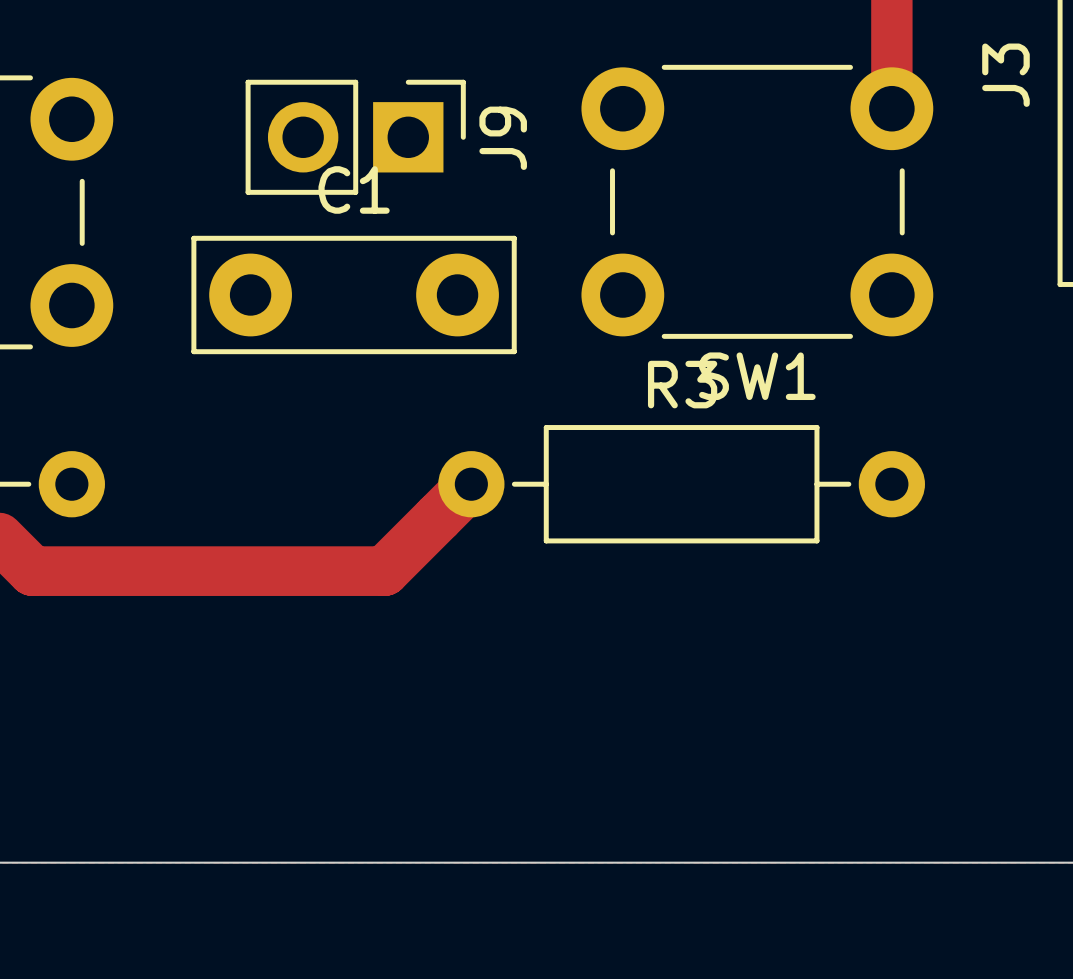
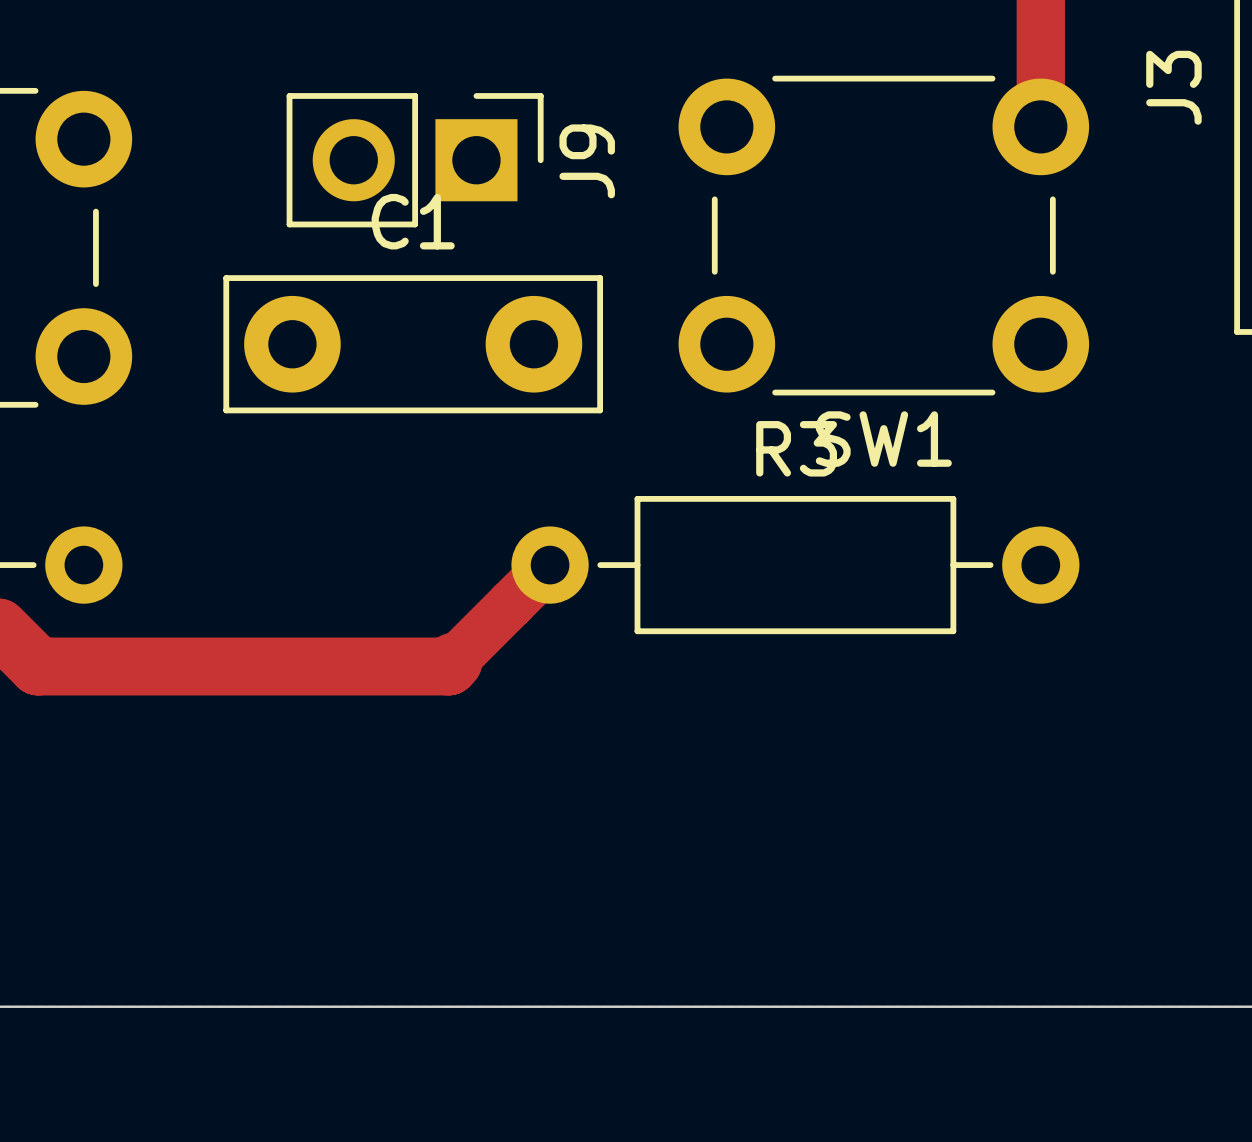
track width: thick (471, 484) (388, 567) -> thin (550, 565) (453, 661)

